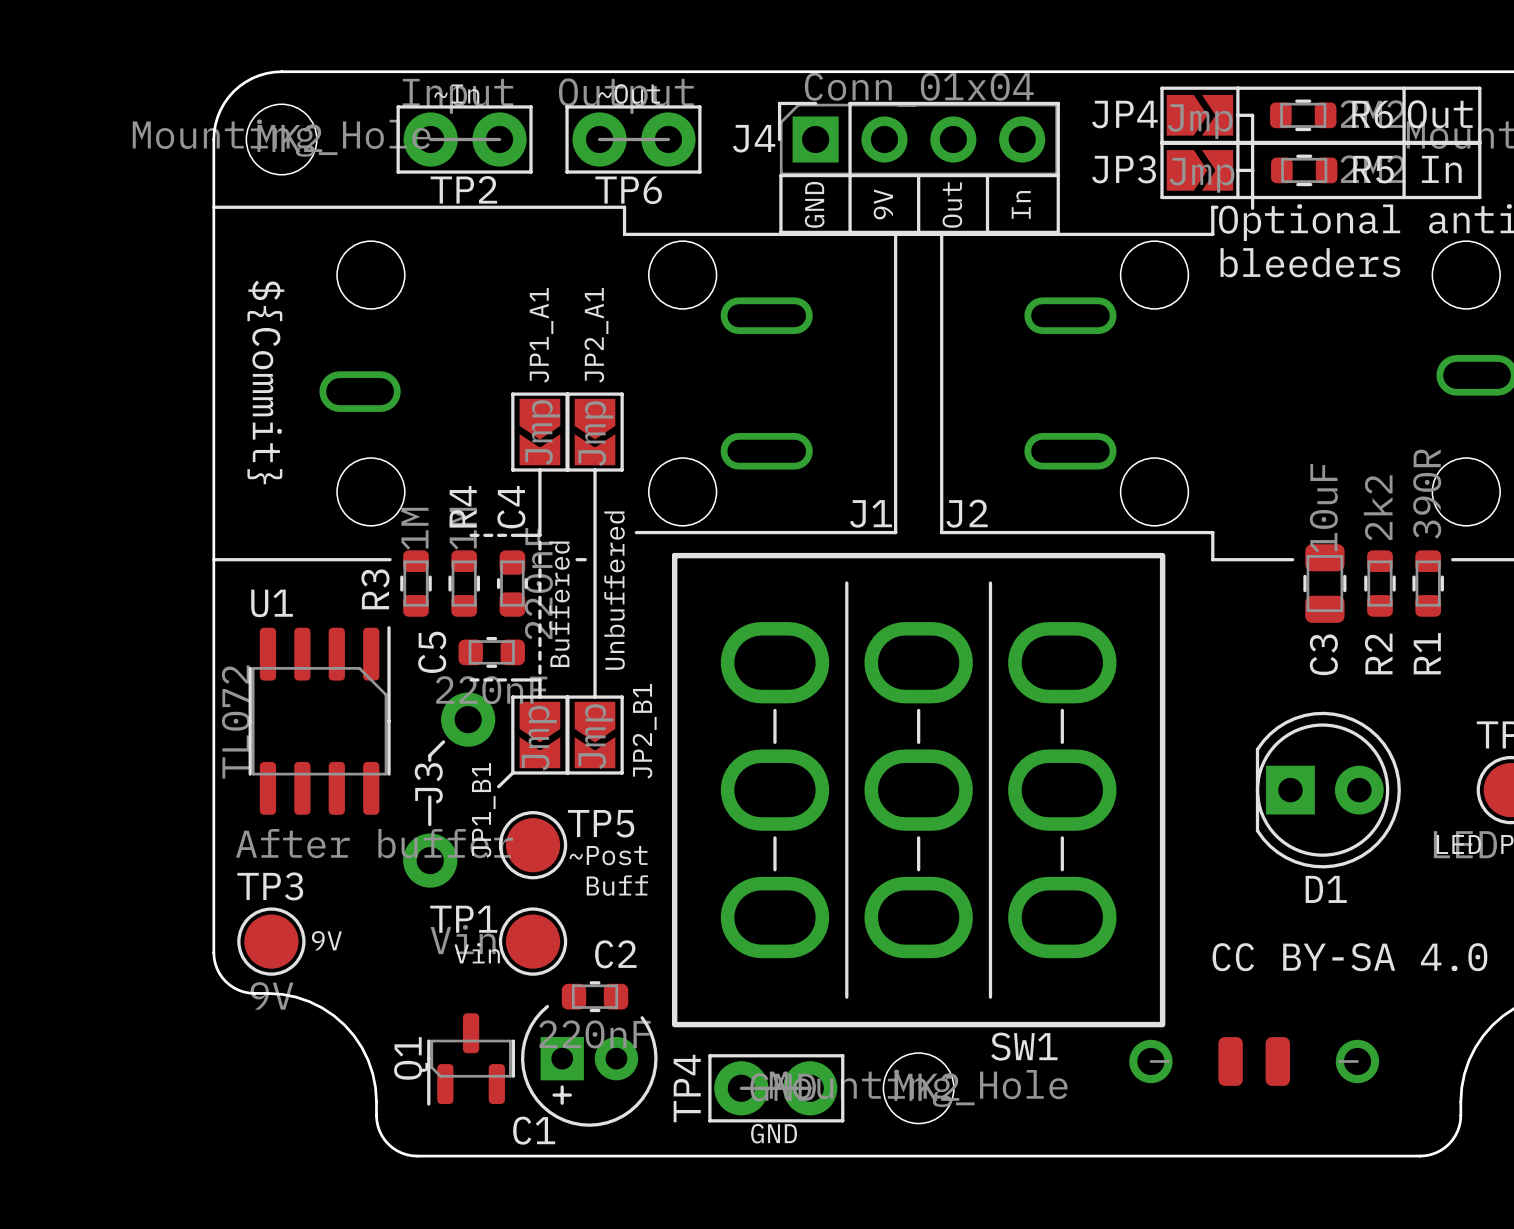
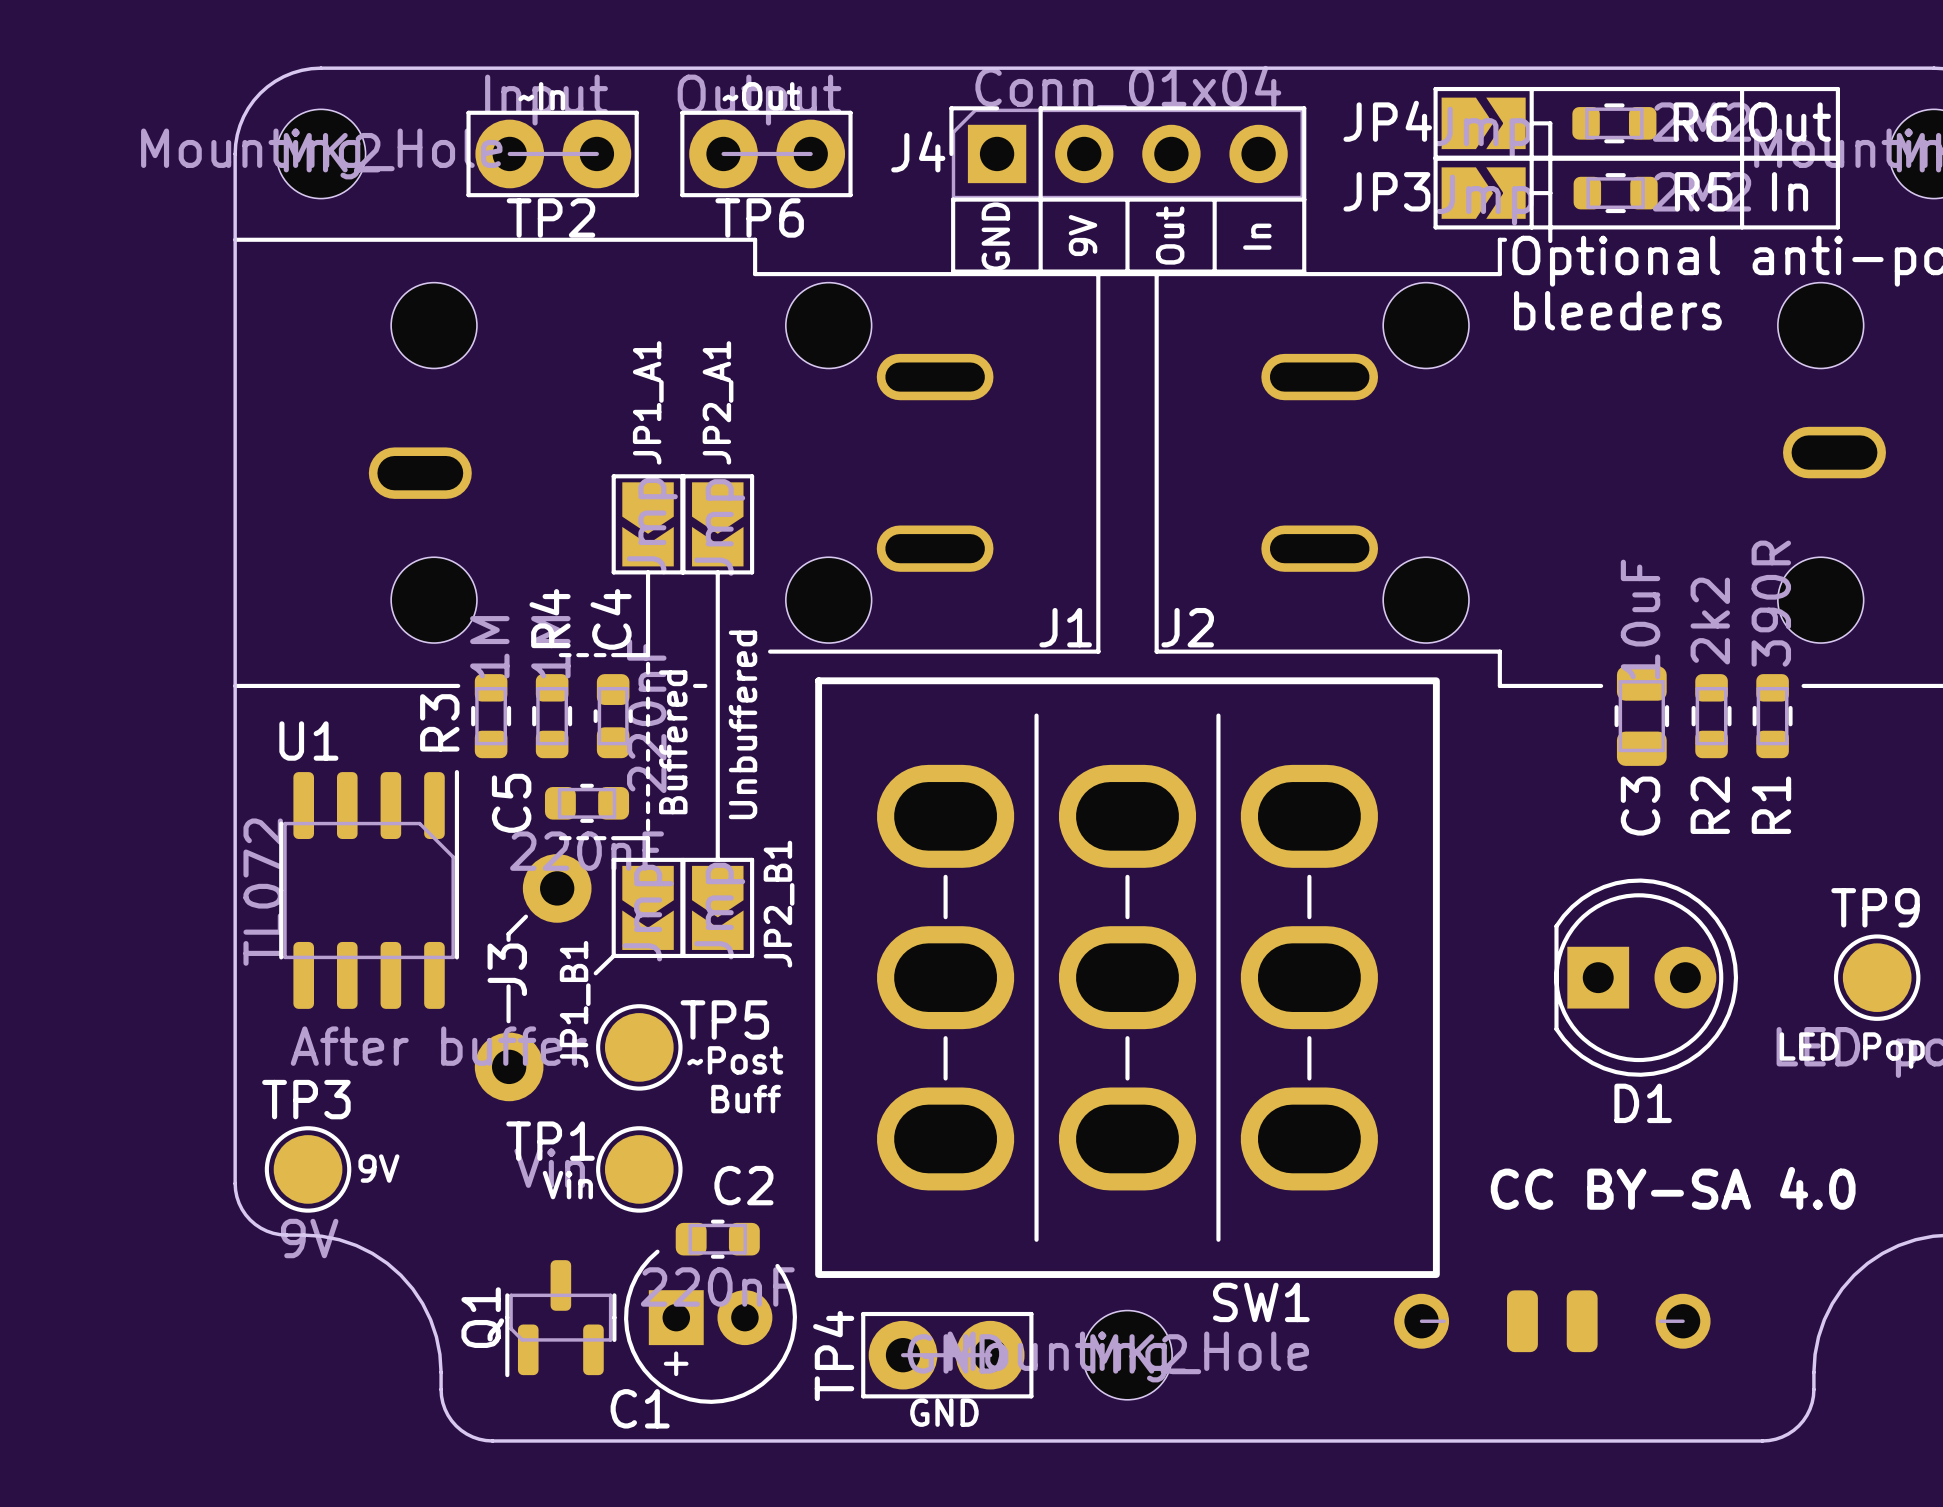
text: ${Commit} (265, 382) -> none

